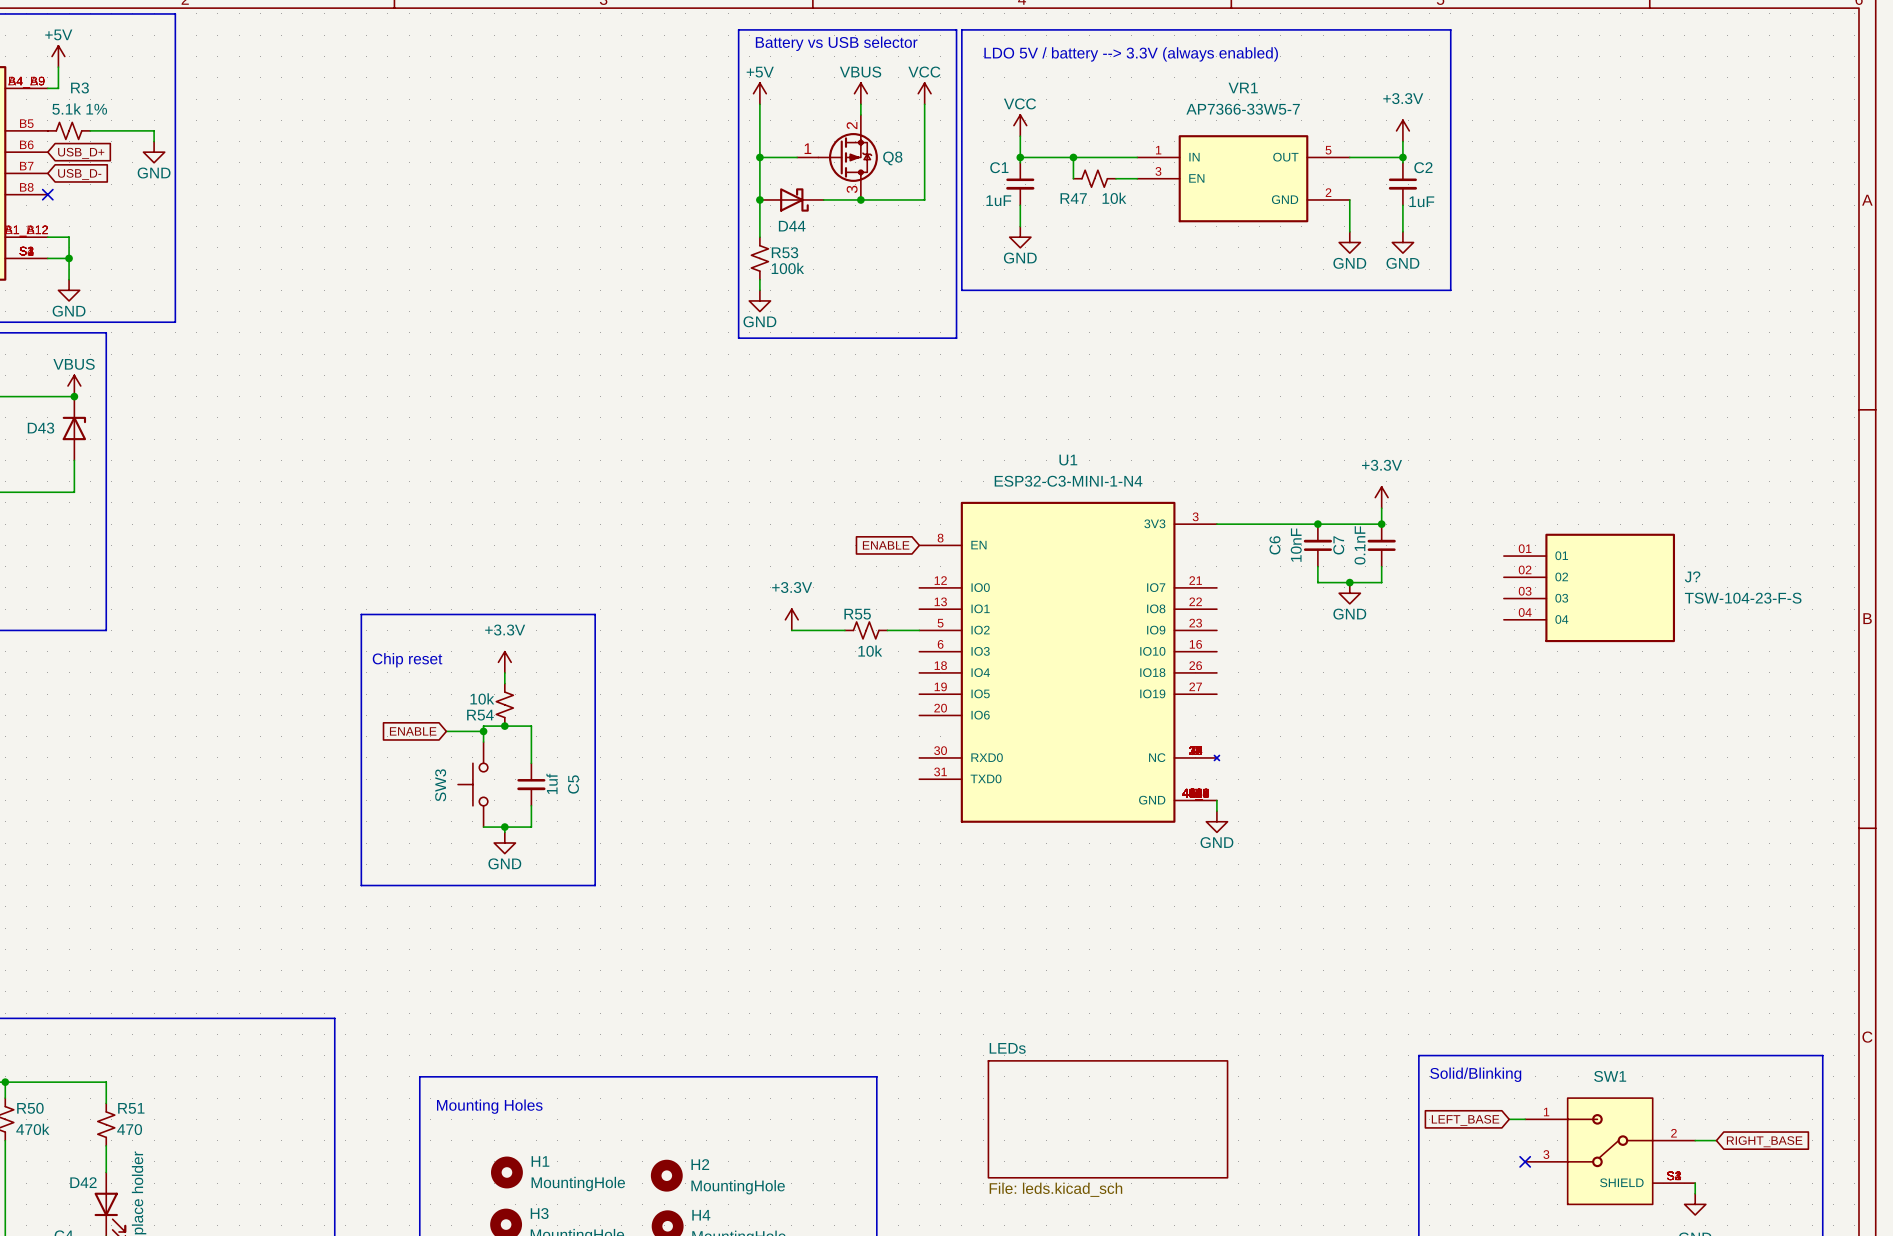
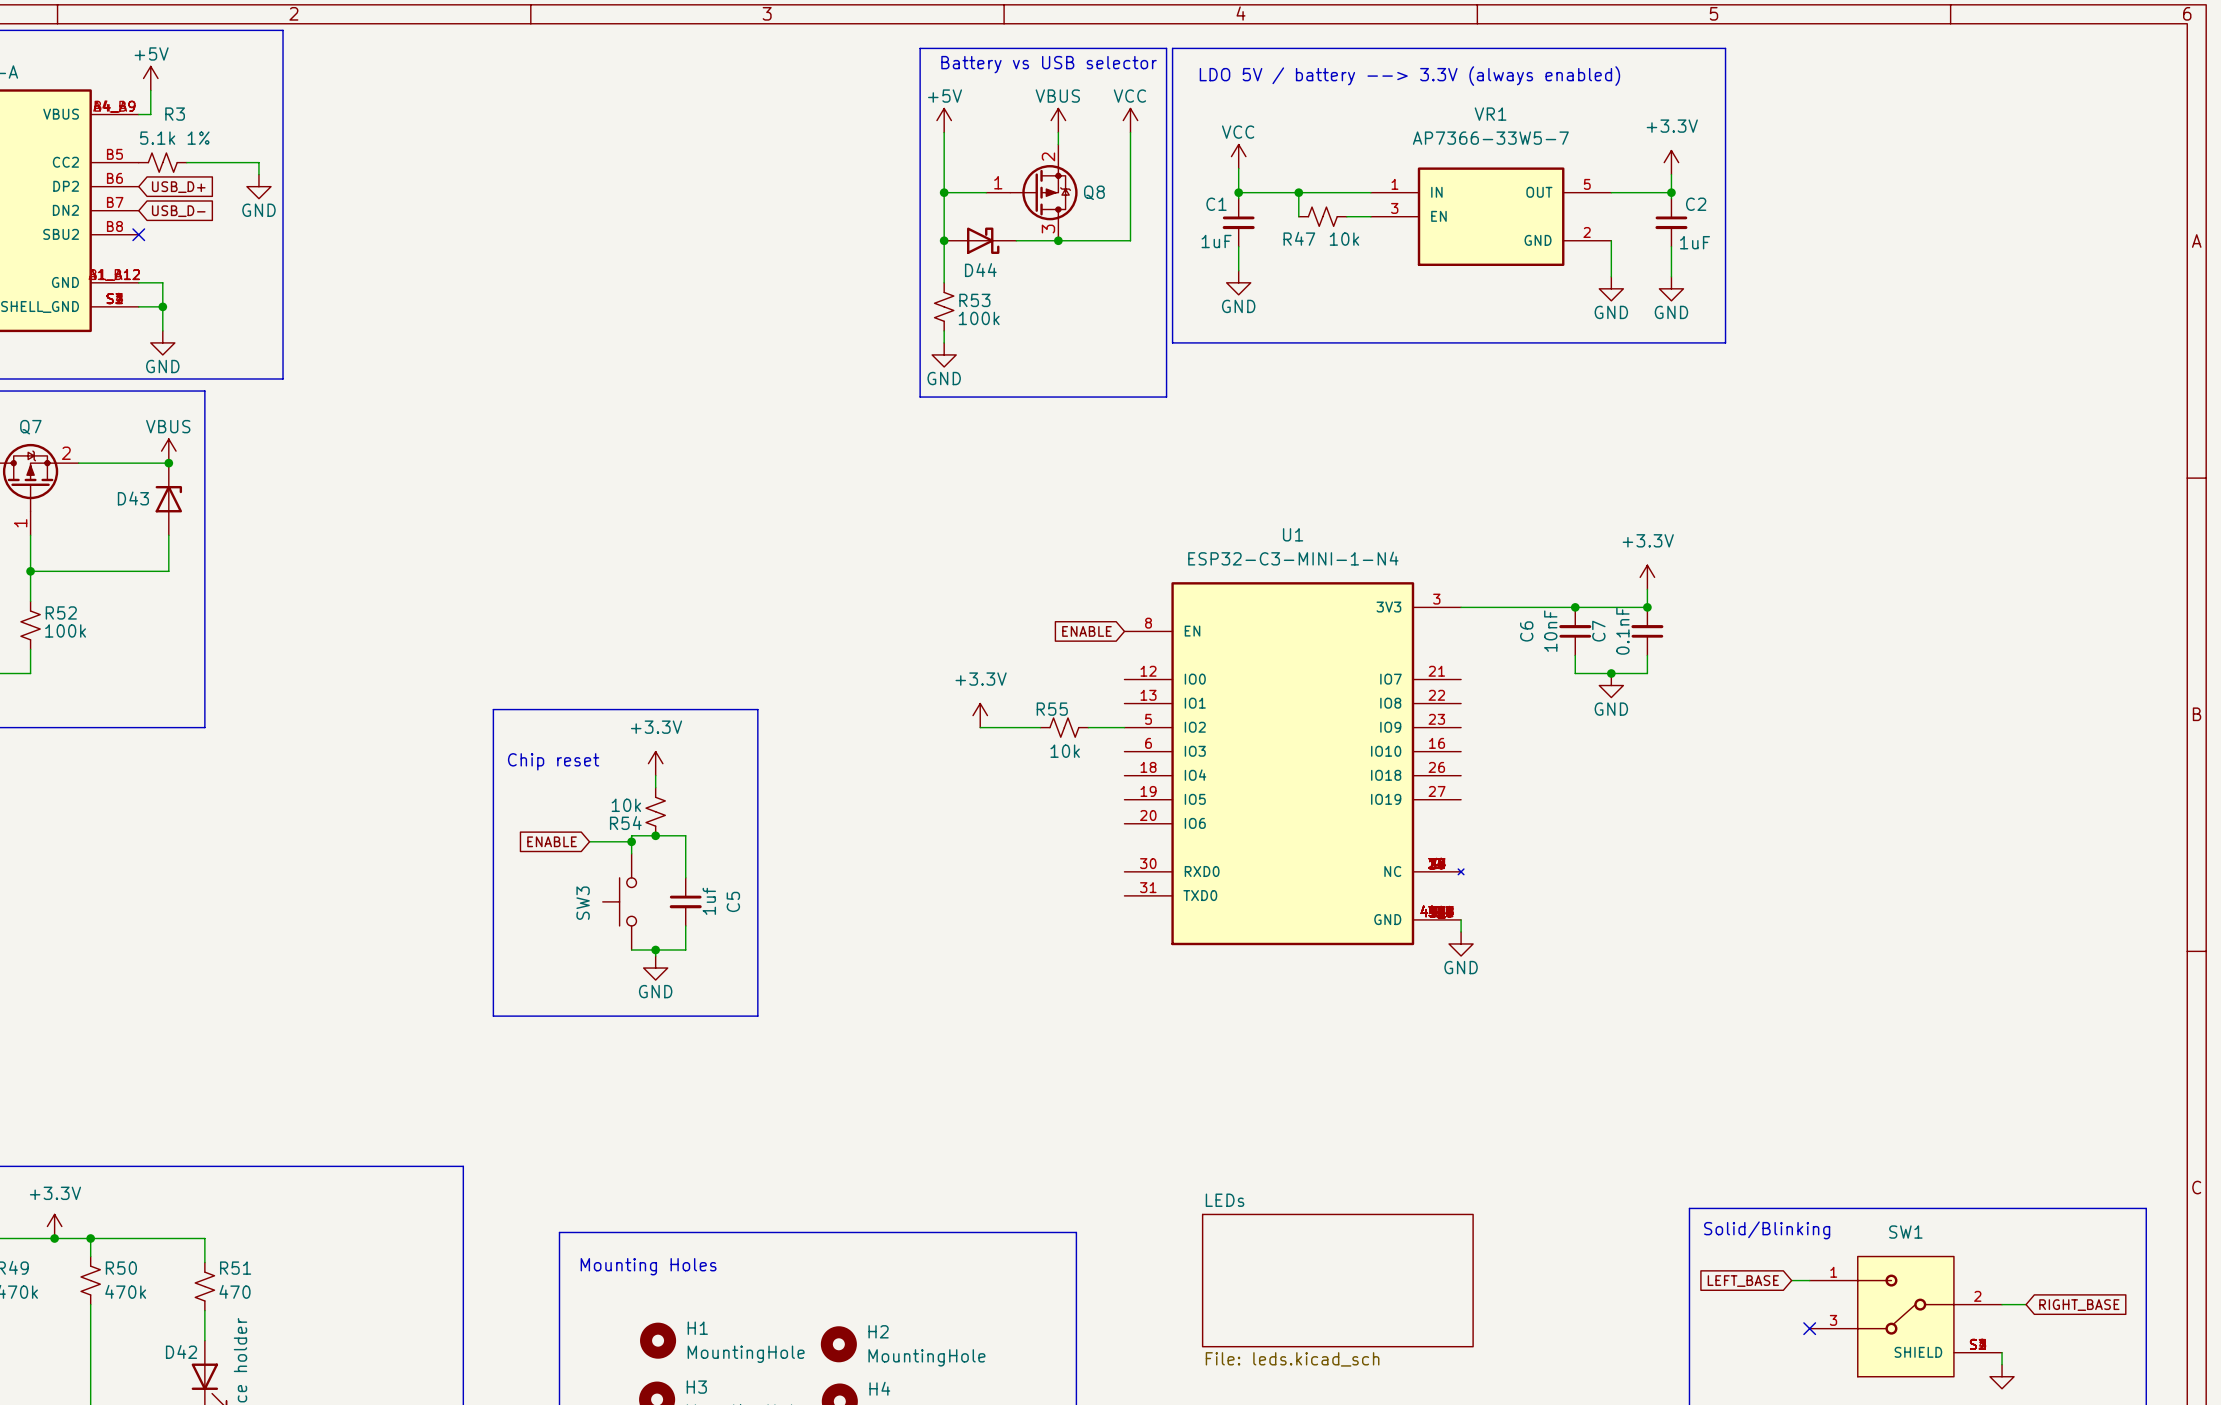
J?: TSW-104-23-F-S (1589, 587) -> none

